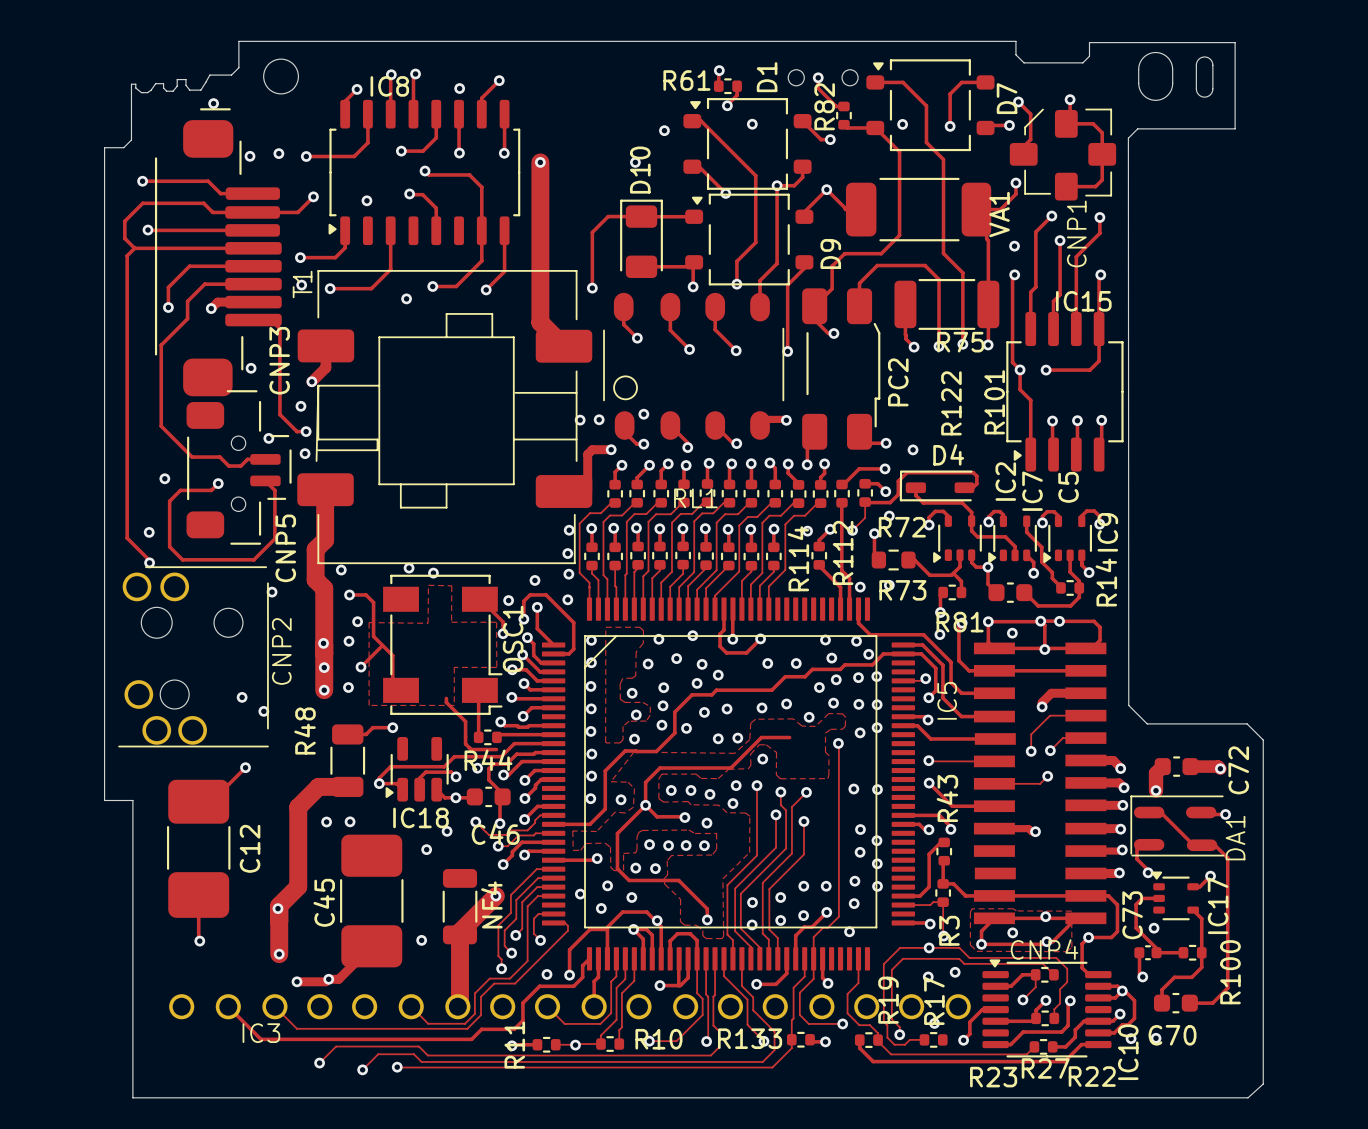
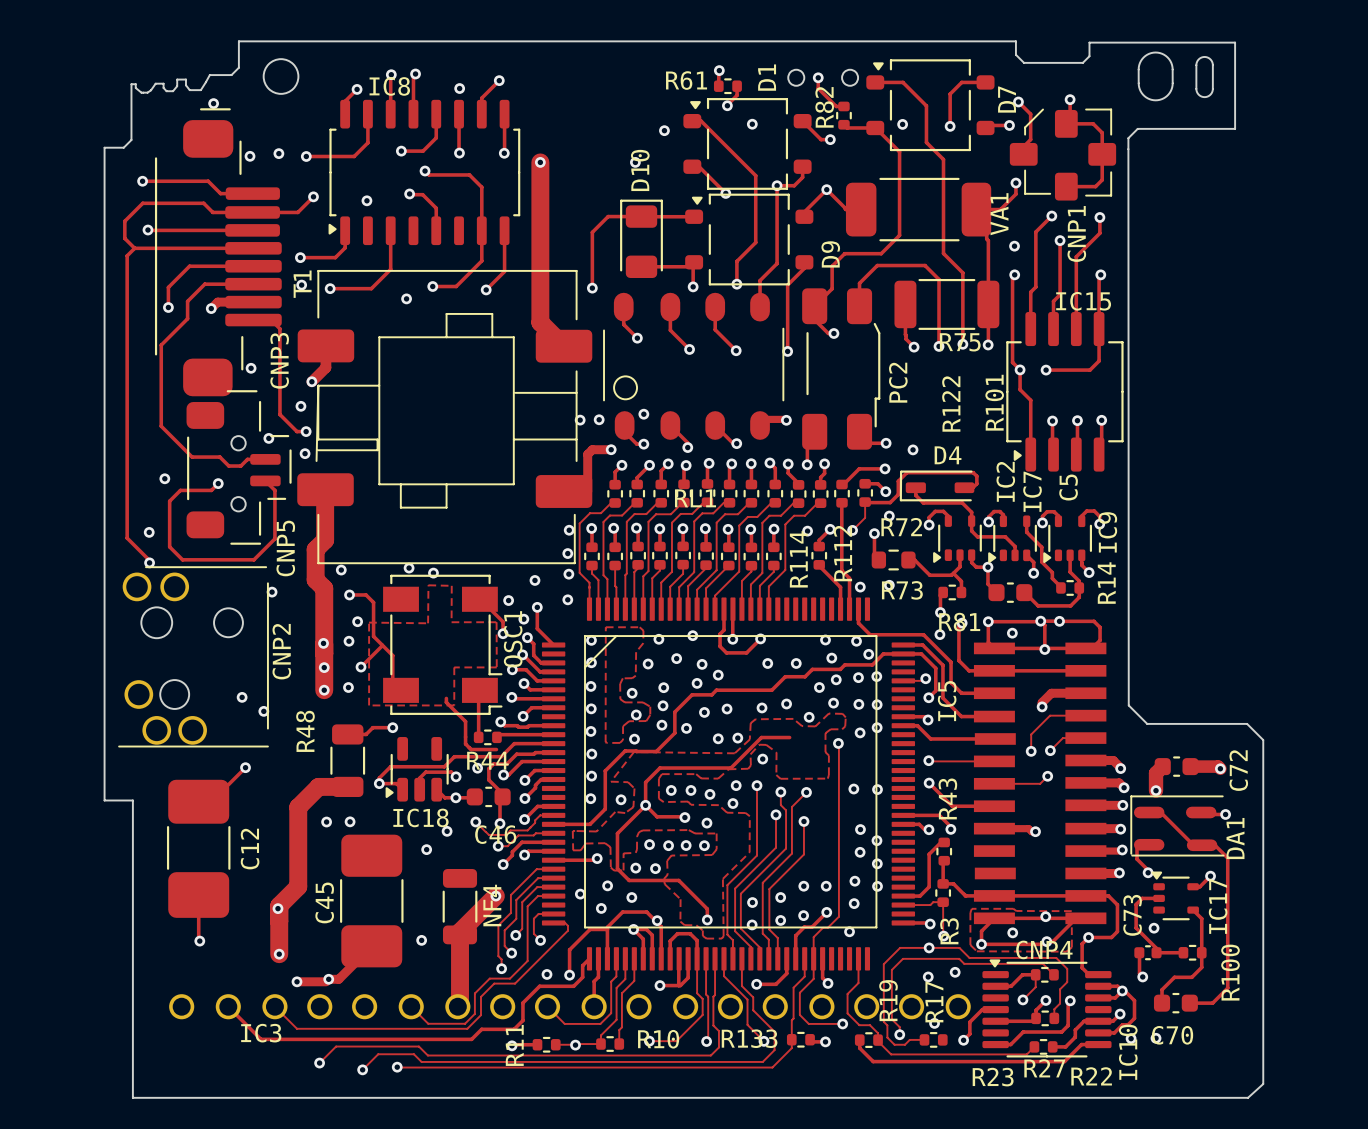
track: (523, 619) (523, 601) (530, 594) (546, 594) (573, 622) (573, 649) (568, 653) (553, 653) -> none

